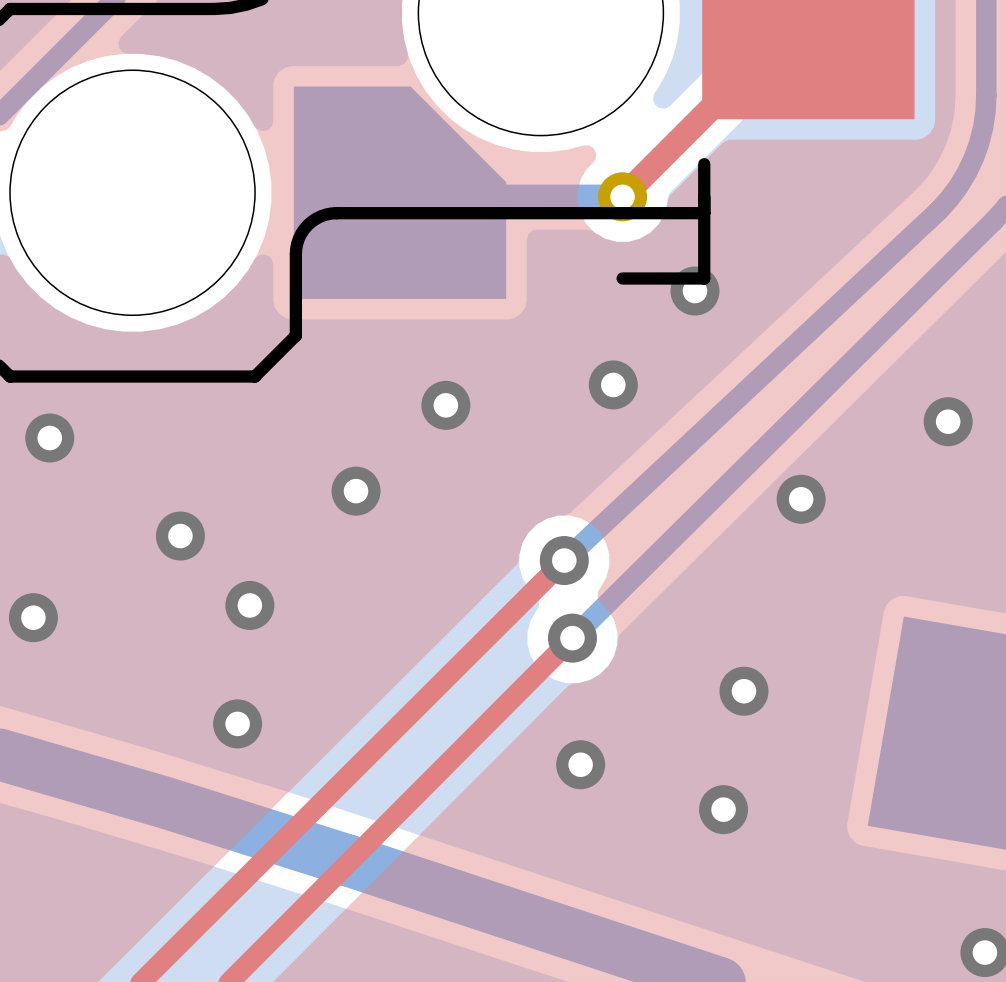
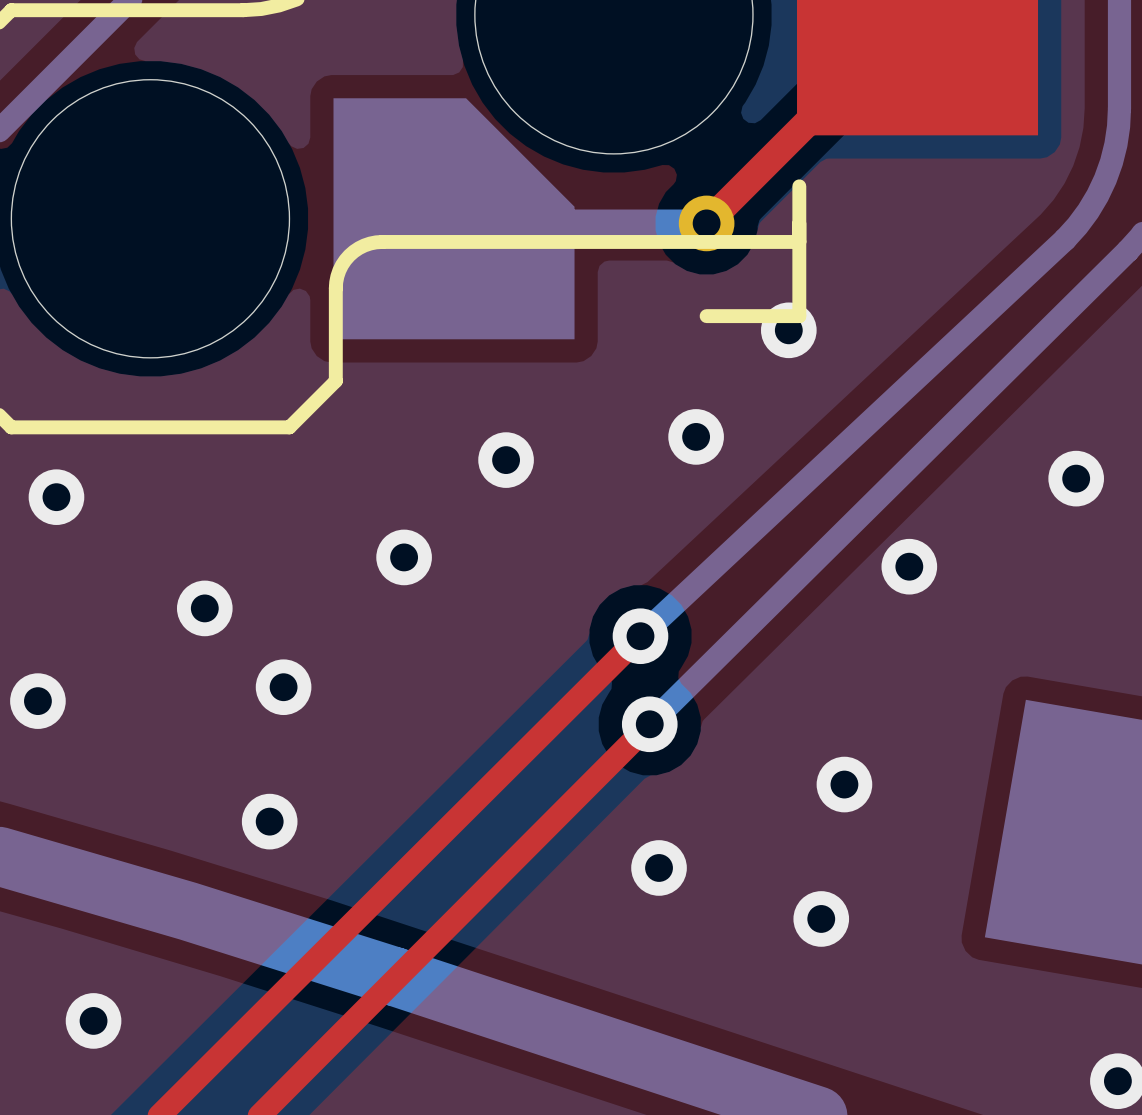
via: none -> (93, 1020)

